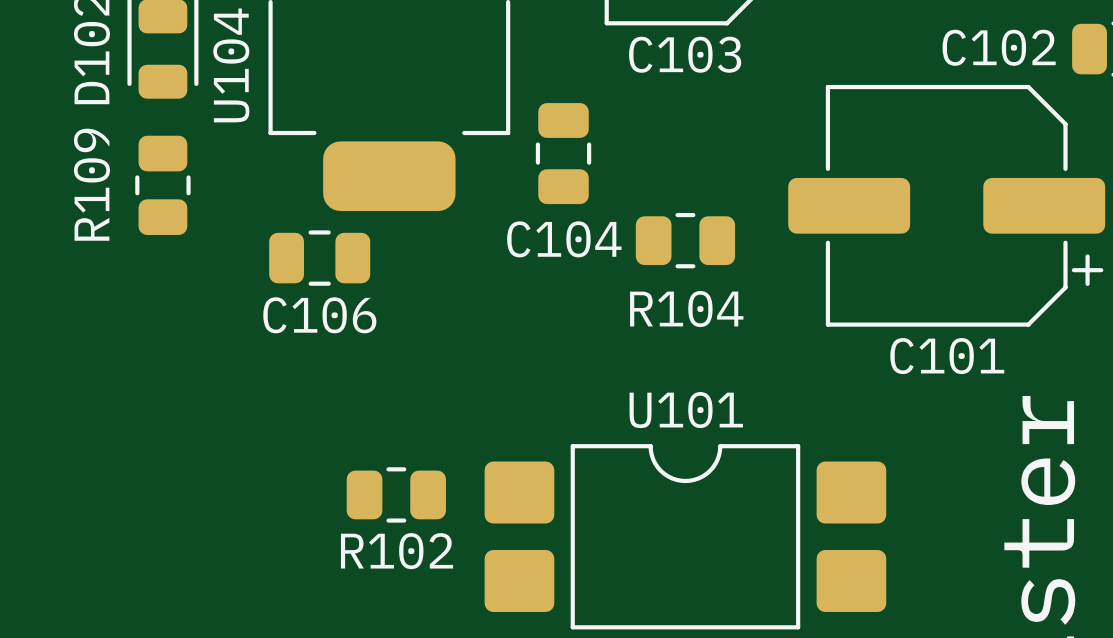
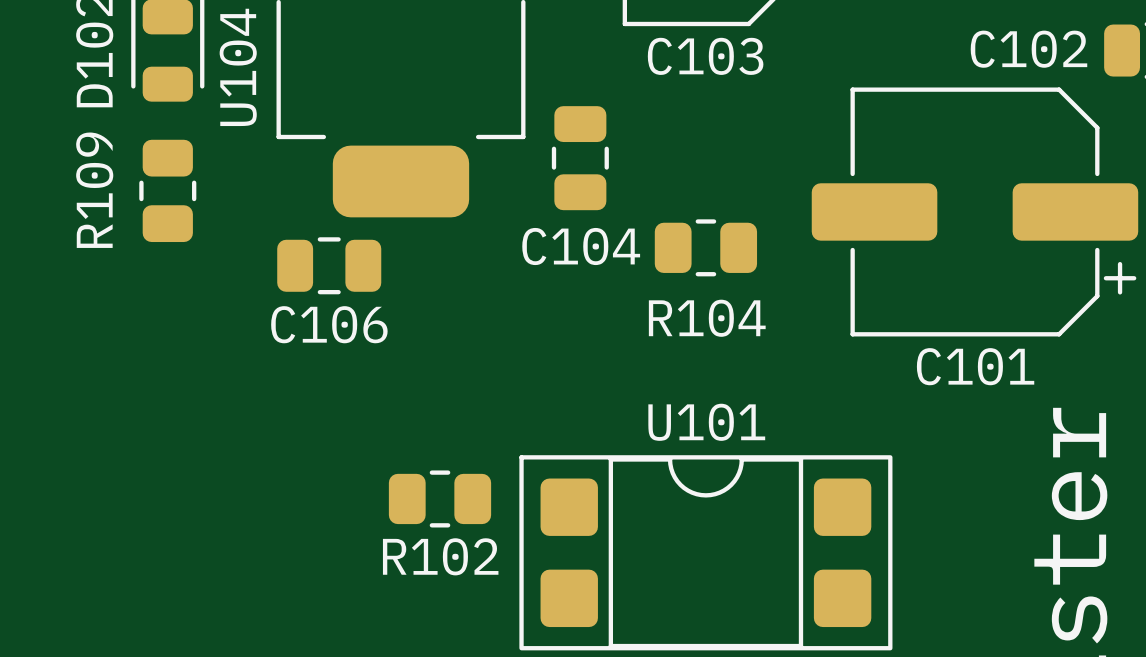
U101 footprint: [484, 444, 887, 630] -> [519, 455, 893, 651]
R102 position: (396, 494) -> (440, 498)

